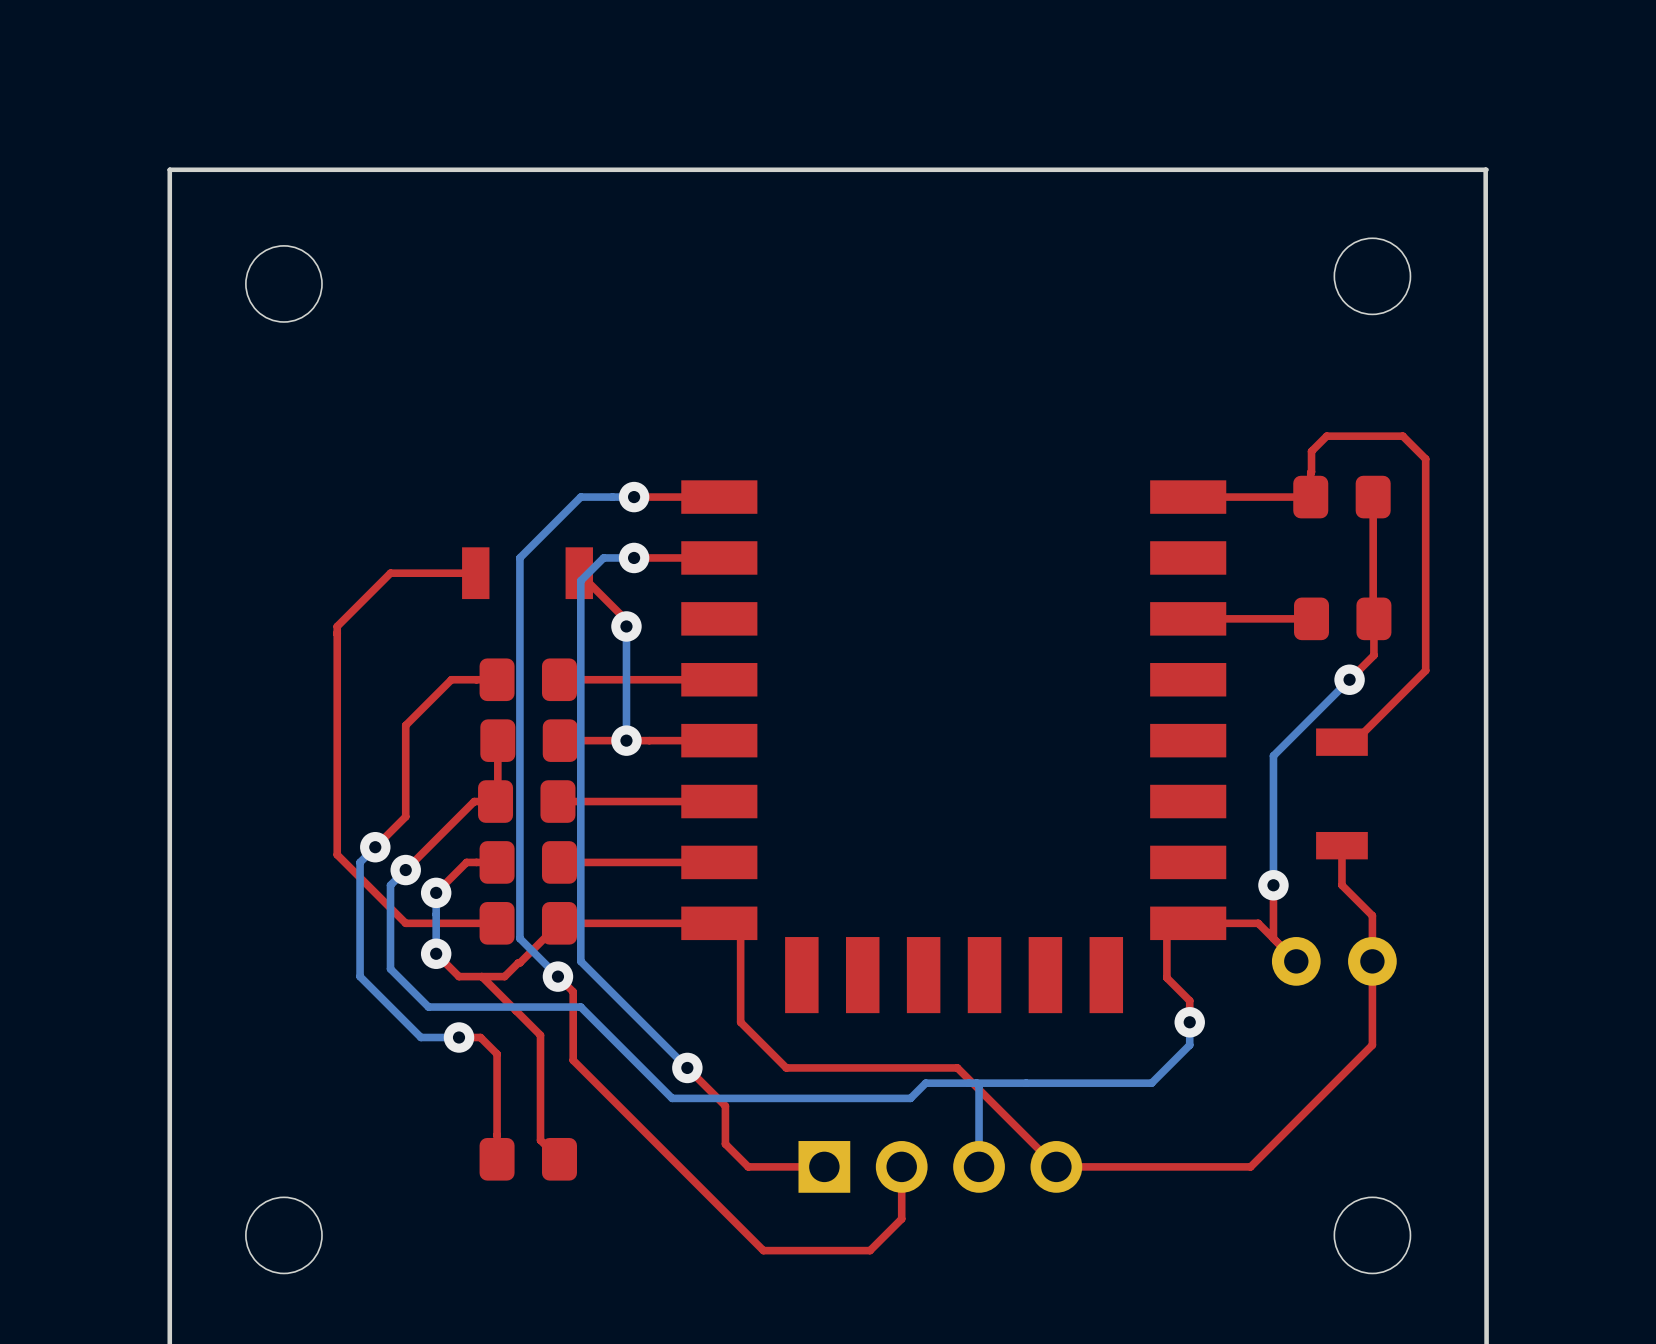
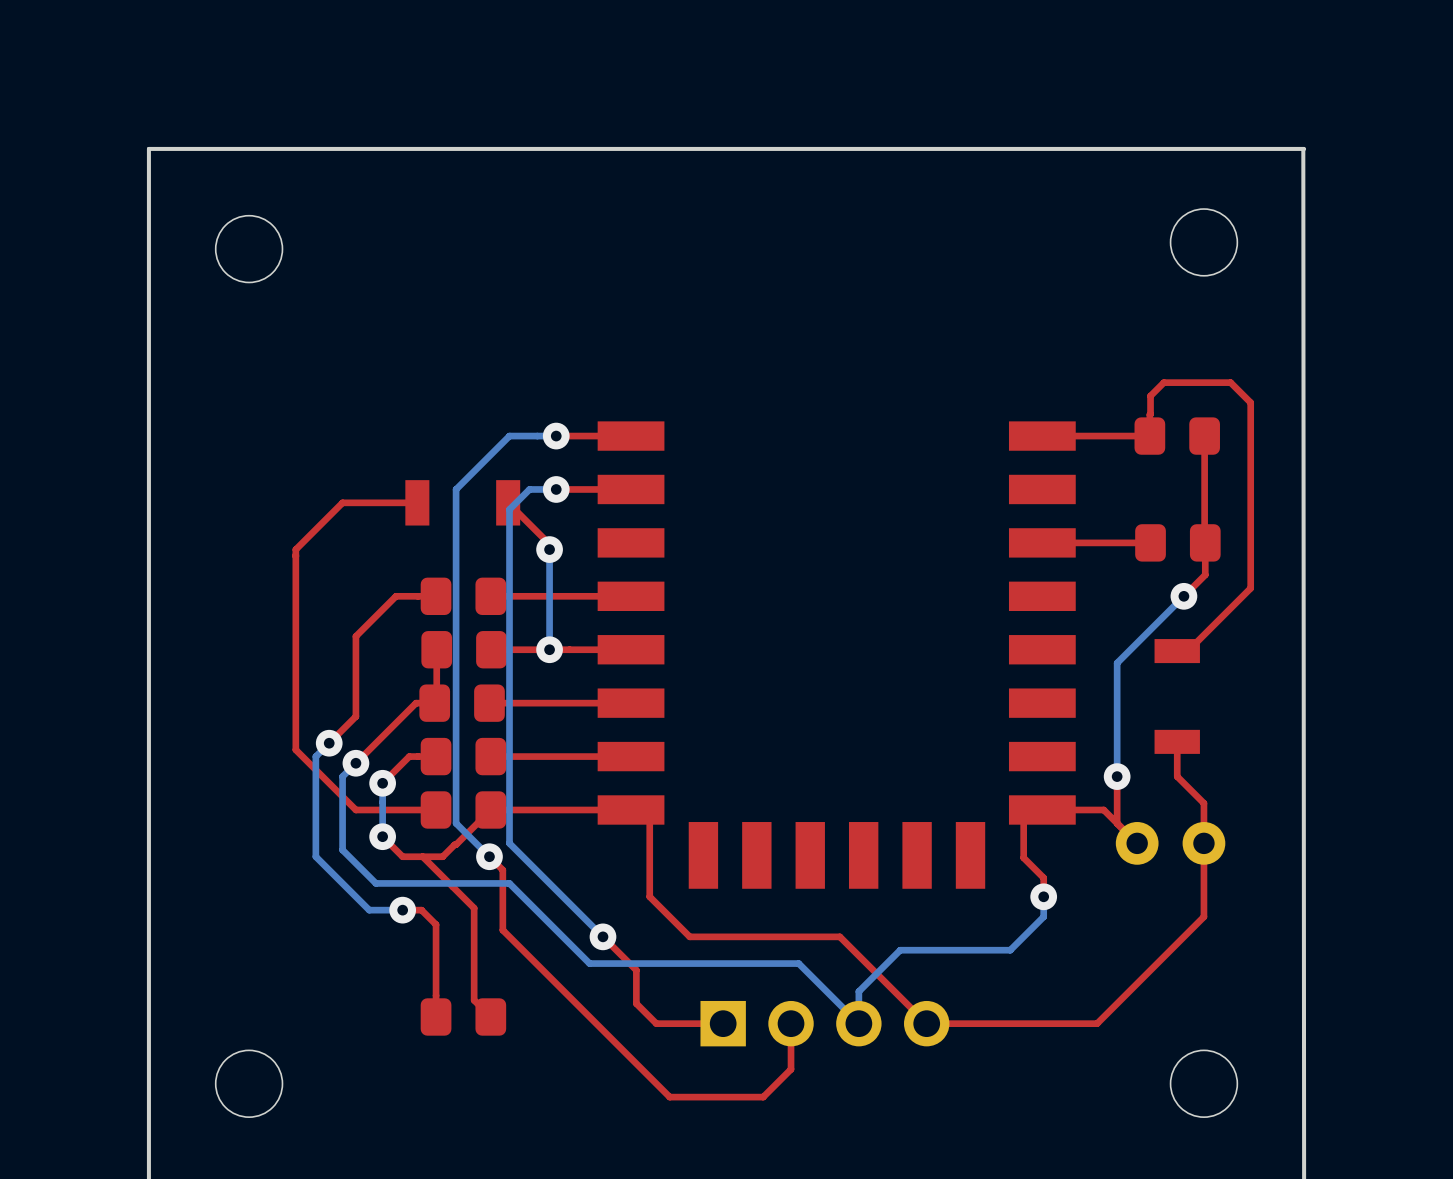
bottom track: (976, 1083) (979, 1085) (979, 1130) -> (900, 950) (858, 991)
bottom track: (1026, 1083) (925, 1083) (910, 1098) -> (858, 1023) (798, 963)

